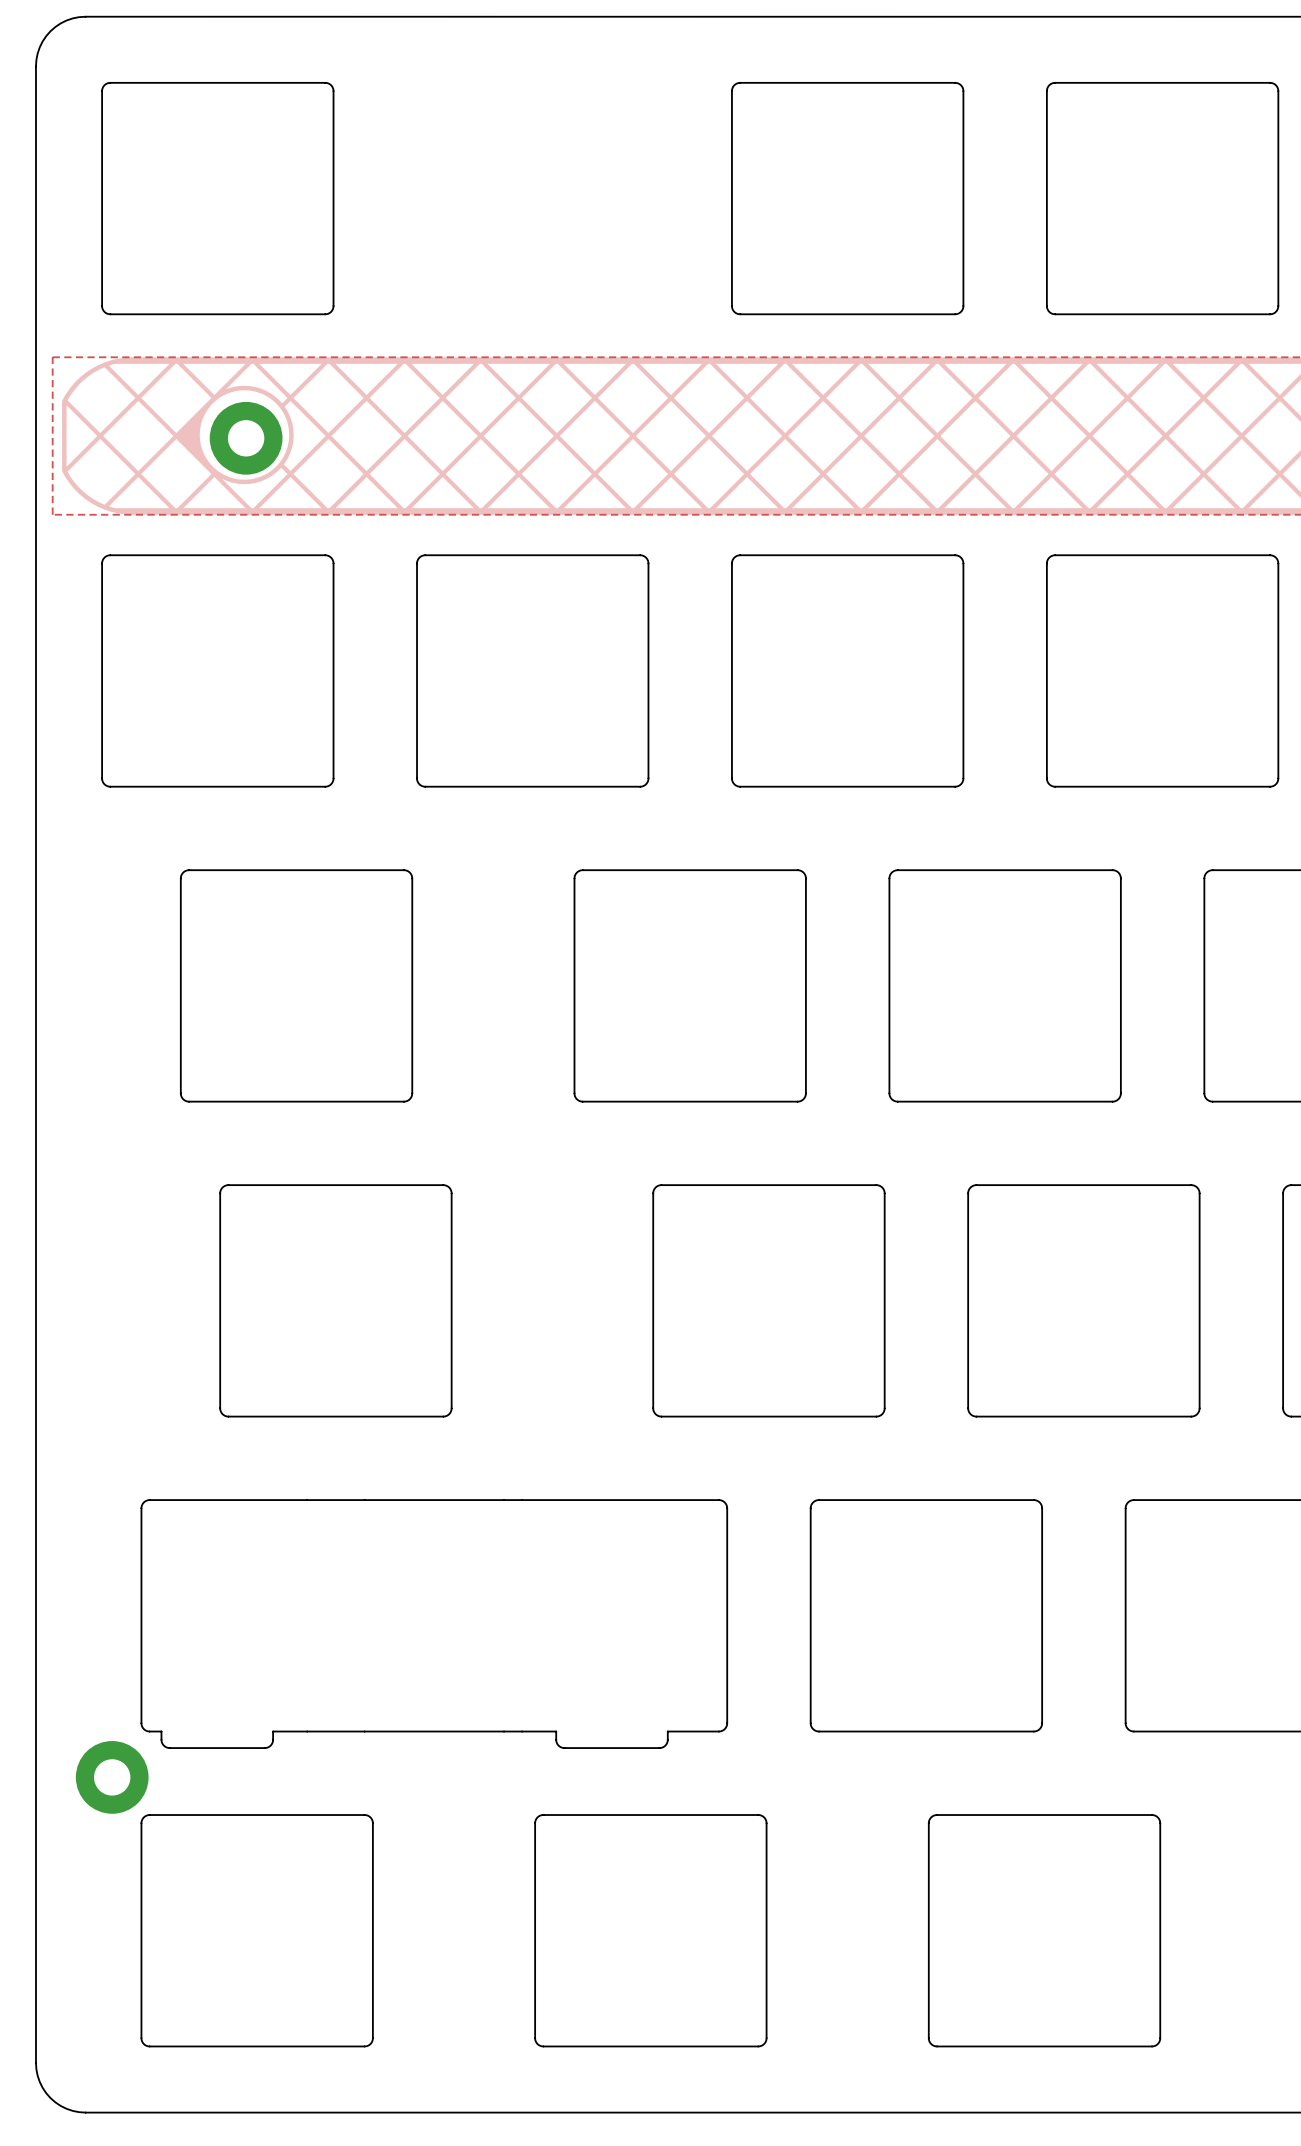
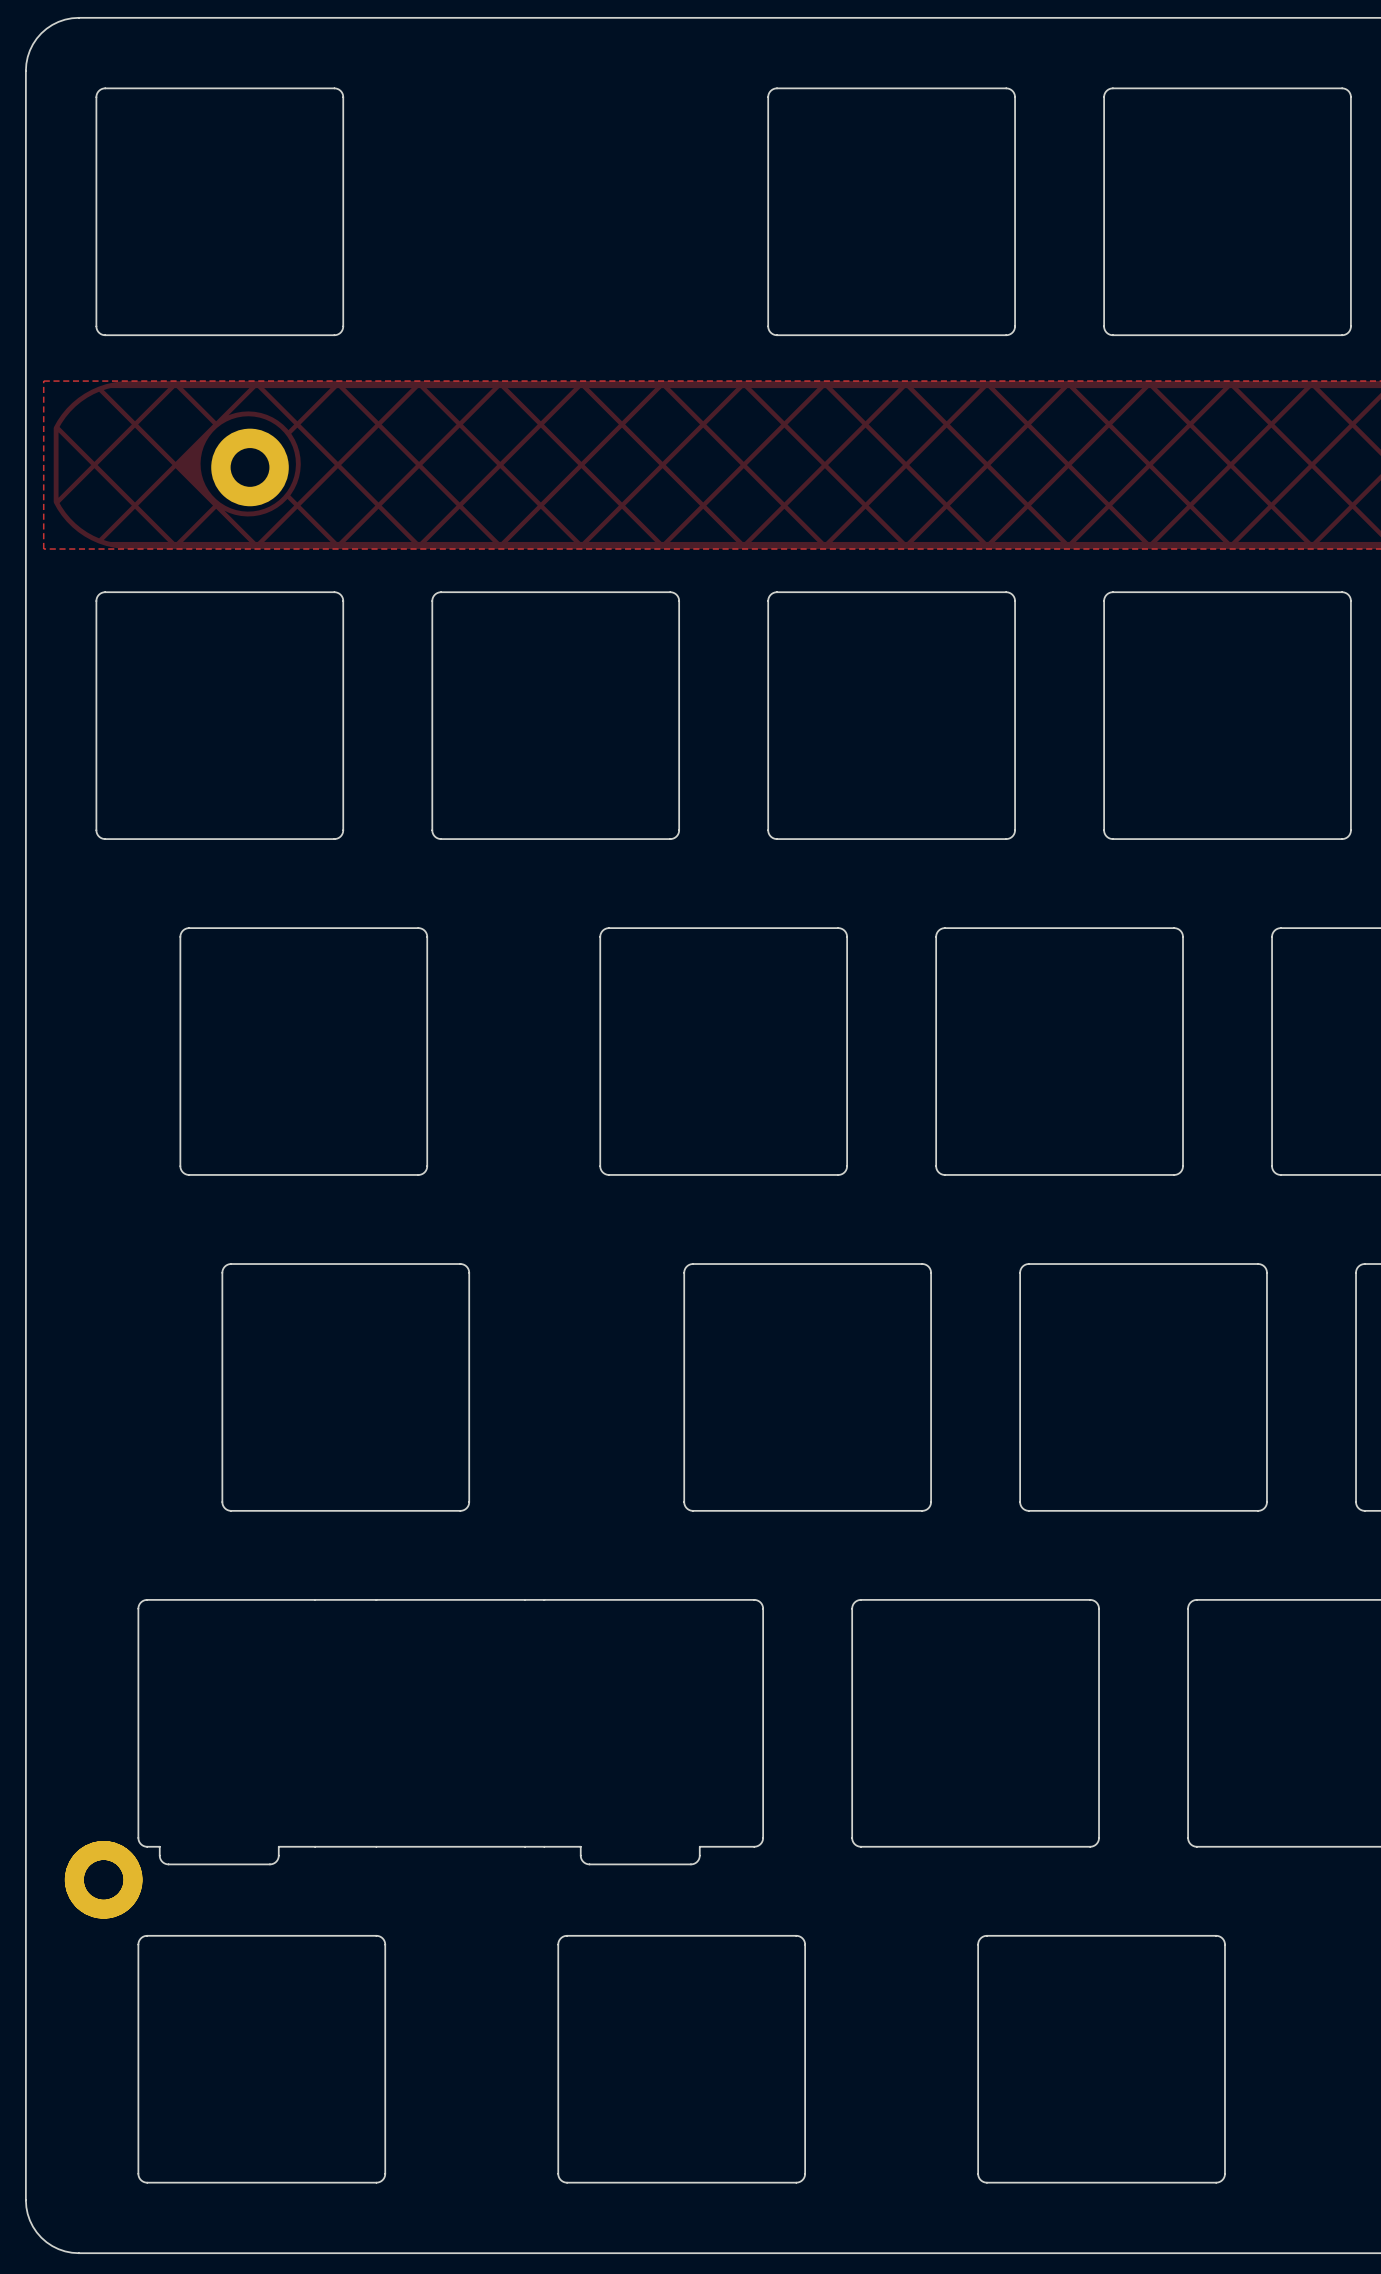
part position: (112, 1777) -> (103, 1879)

